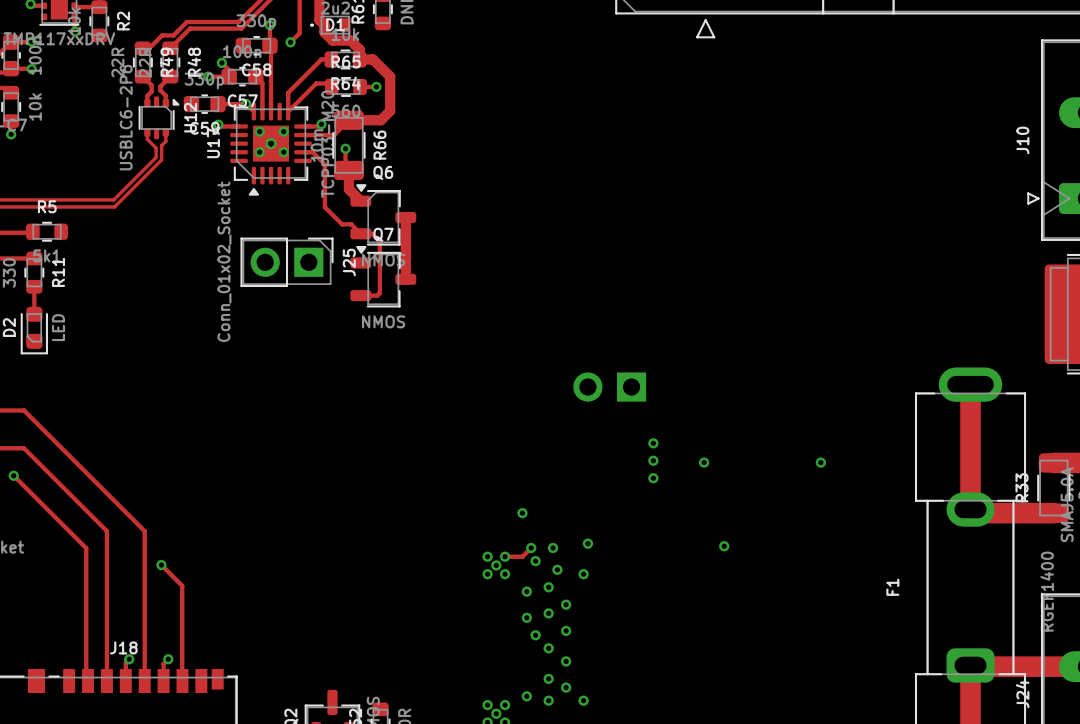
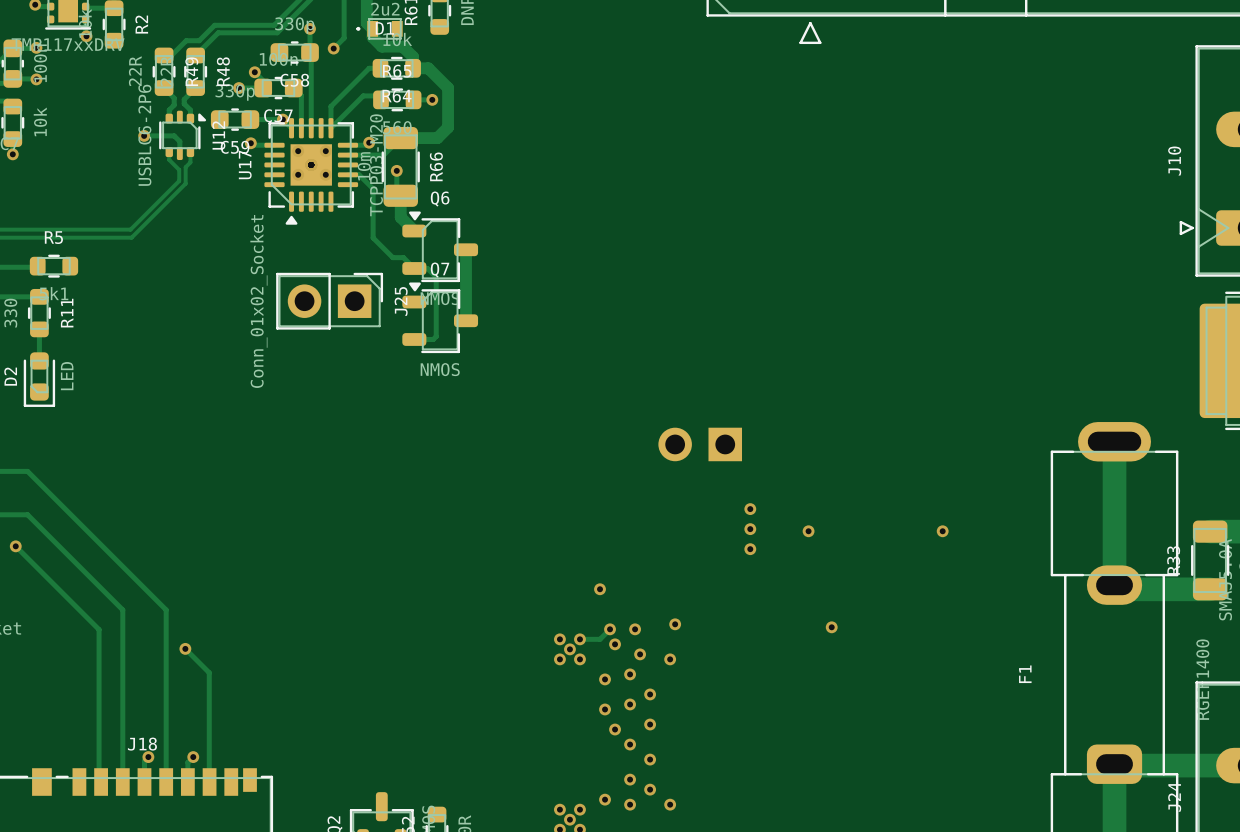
track: none -> (144, 135) (174, 135) (179, 141) (179, 153)
via: none -> (144, 135)

